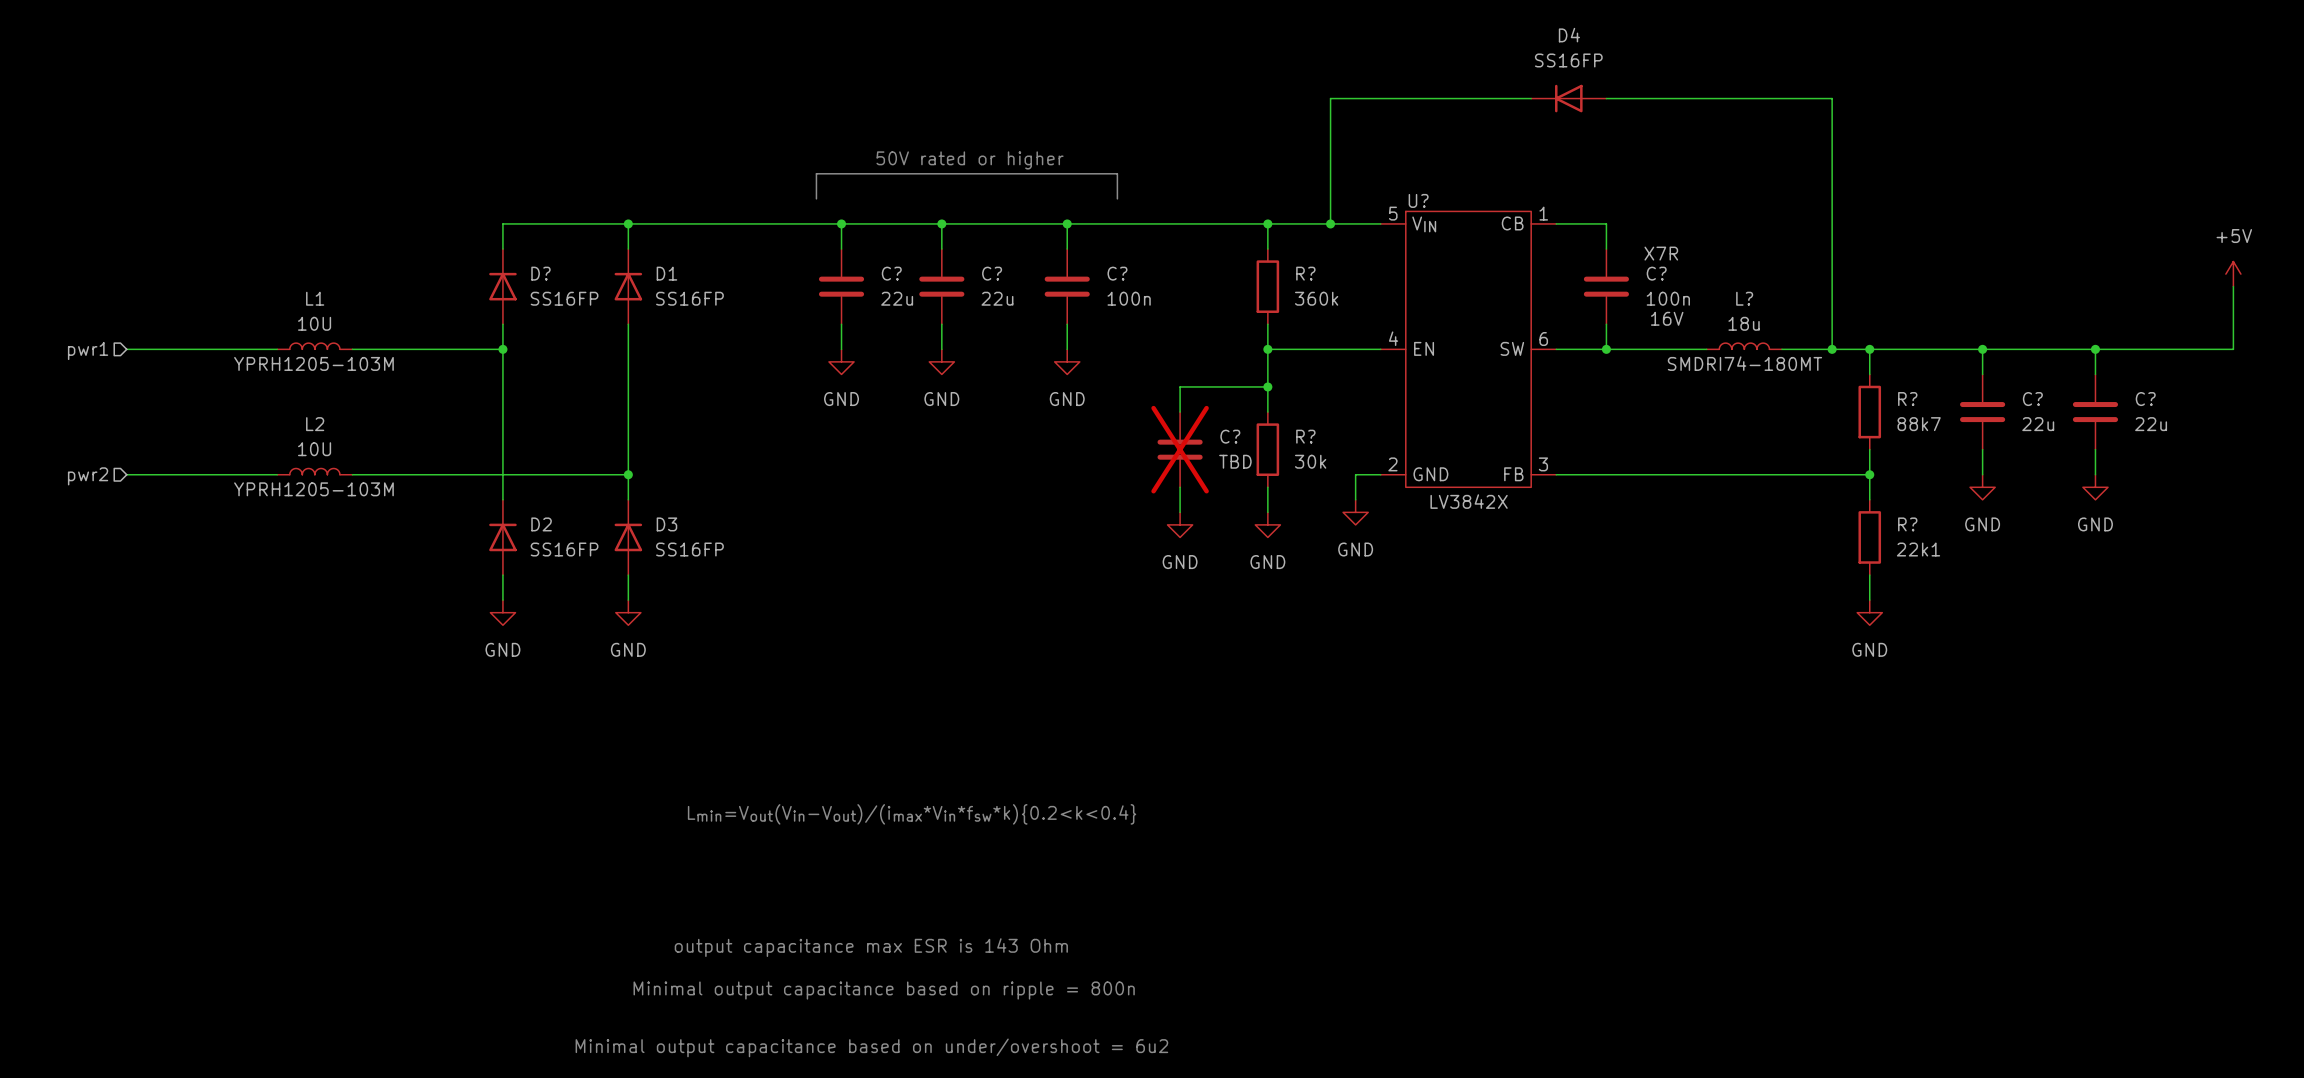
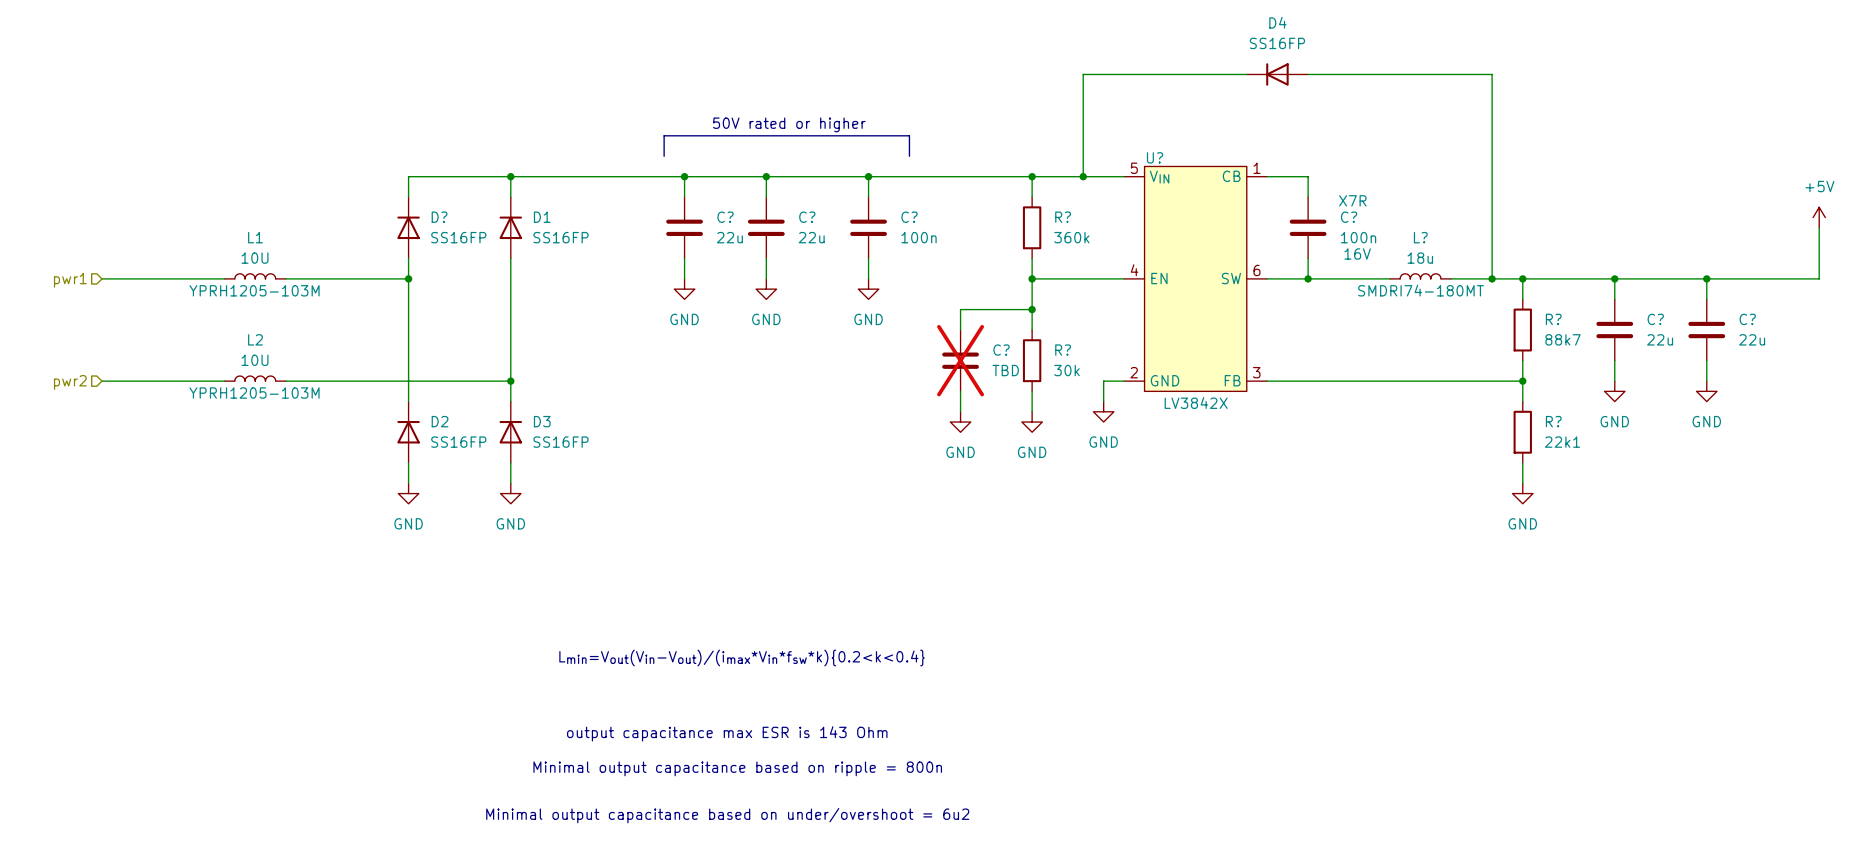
text position: output capacitance max ESR is 143 Ohm (871, 947) -> output capacitance max ESR is 143 Ohm (727, 733)
text position: Minimal output capacitance based on ripple = 800n (884, 990) -> Minimal output capacitance based on ripple = 800n (737, 768)
text position: Minimal output capacitance based on under/overshoot = 6u2 (871, 1047) -> Minimal output capacitance based on under/overshoot = 6u2 (727, 815)

